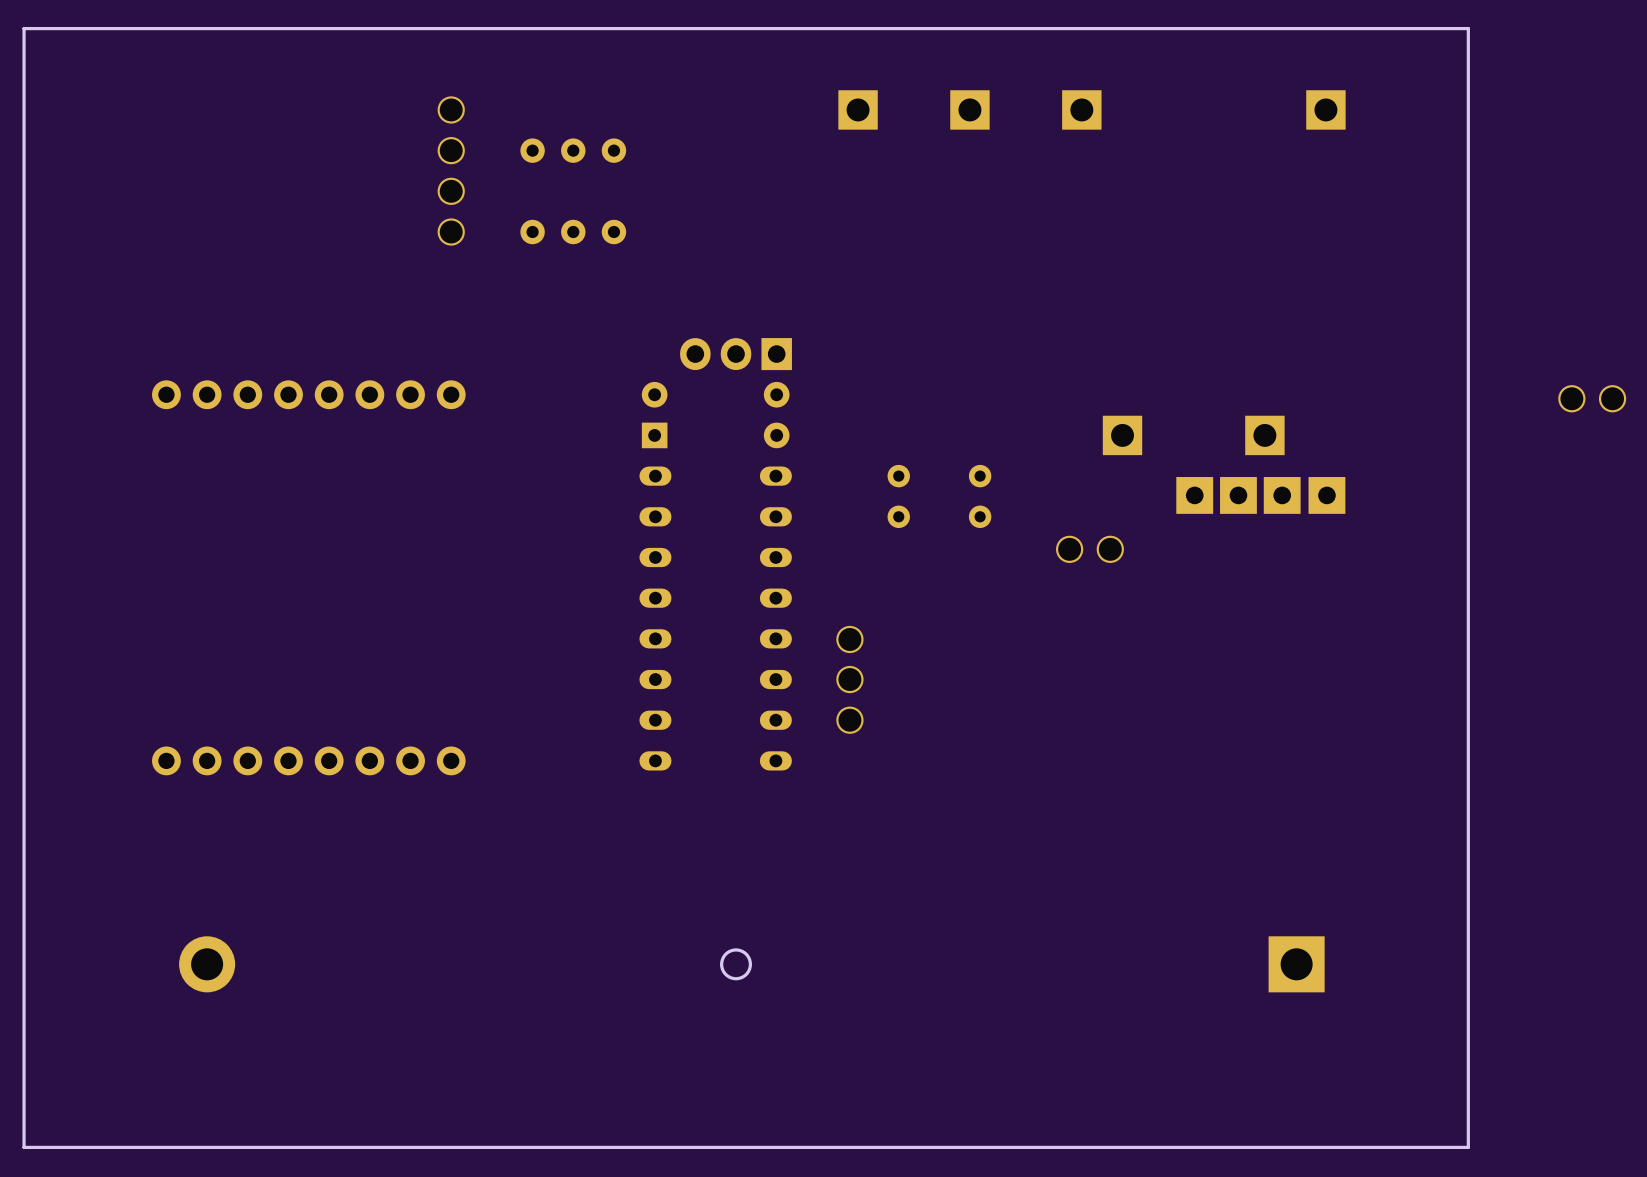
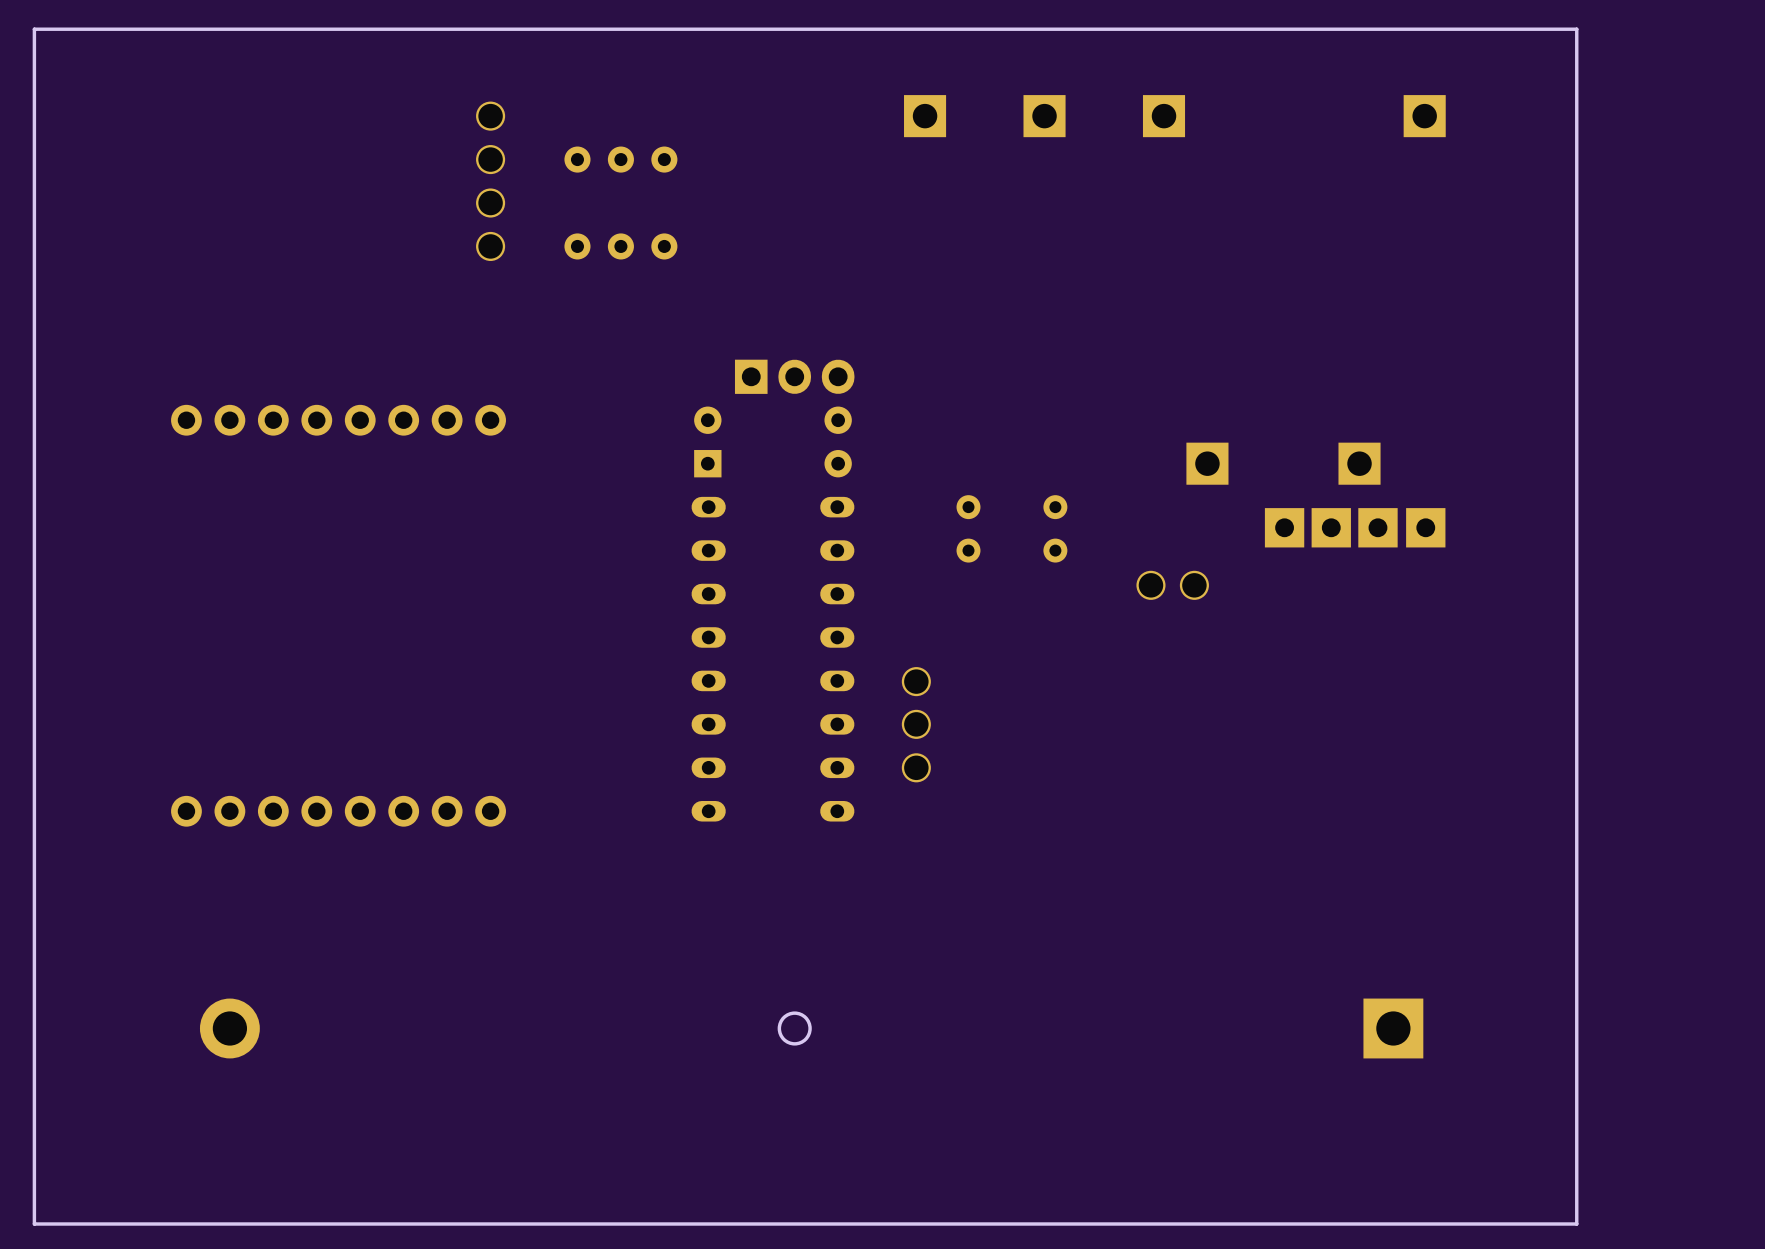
part rotation: 0° (736, 354) -> 180° (794, 376)
part: (1592, 398) -> none

